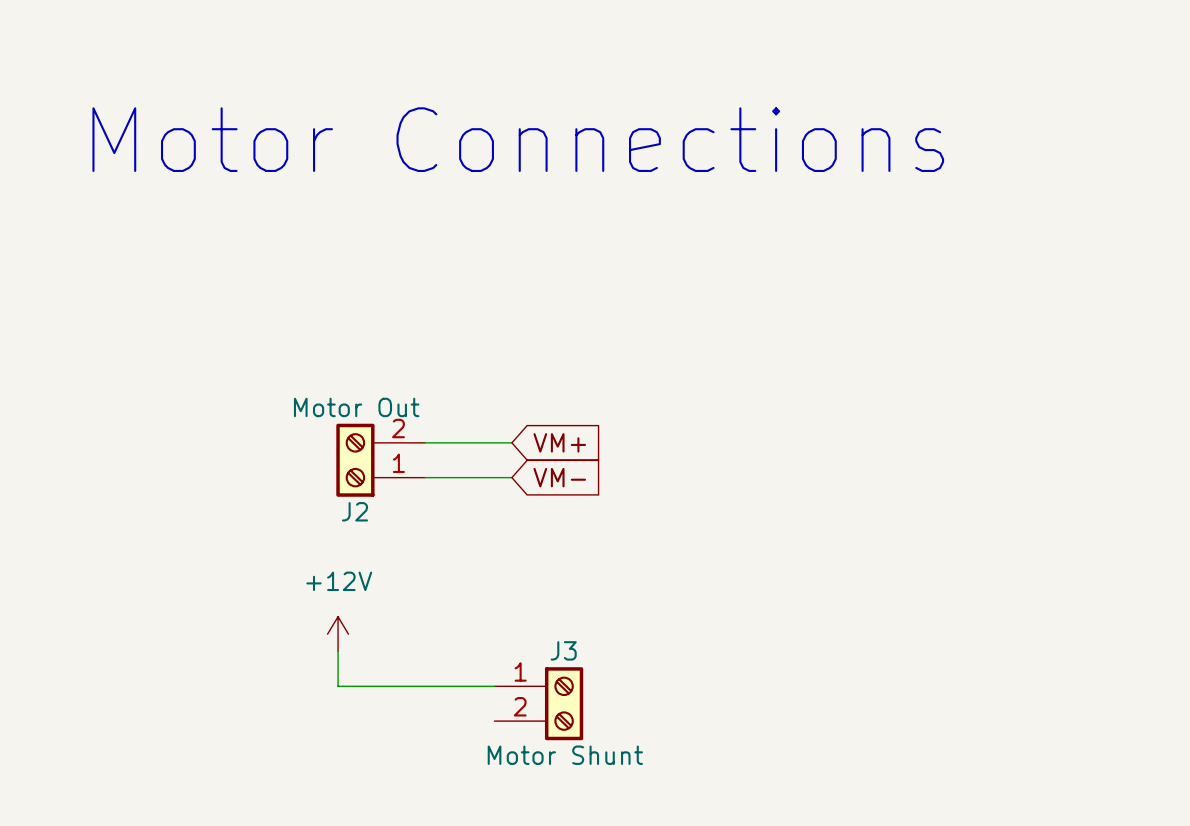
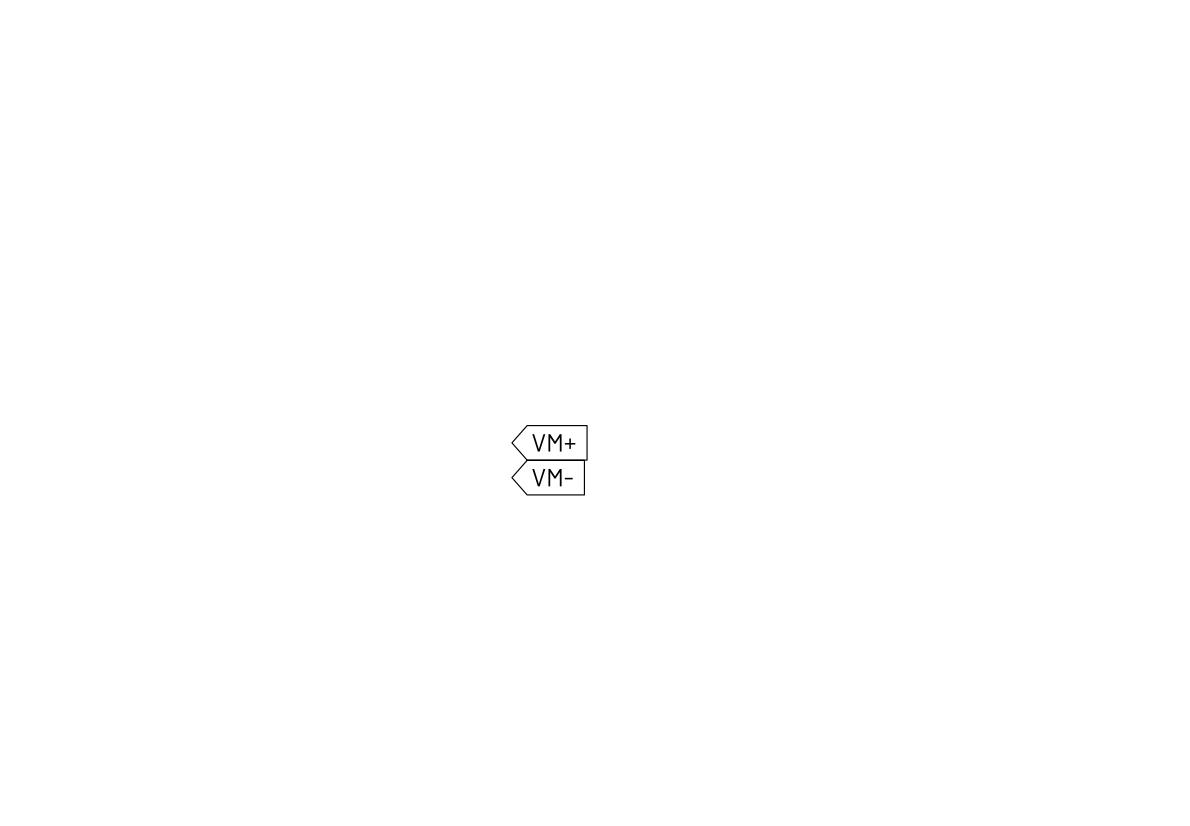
text: Motor Connections (518, 139) -> none
wire: (424, 442) (511, 442) -> none
J2: Motor Out (380, 460) -> none
wire: (424, 477) (511, 477) -> none
power symbol: +12V (338, 634) -> none
wire: (338, 651) (338, 686) (494, 686) -> none
J3: Motor Shunt (538, 703) -> none

